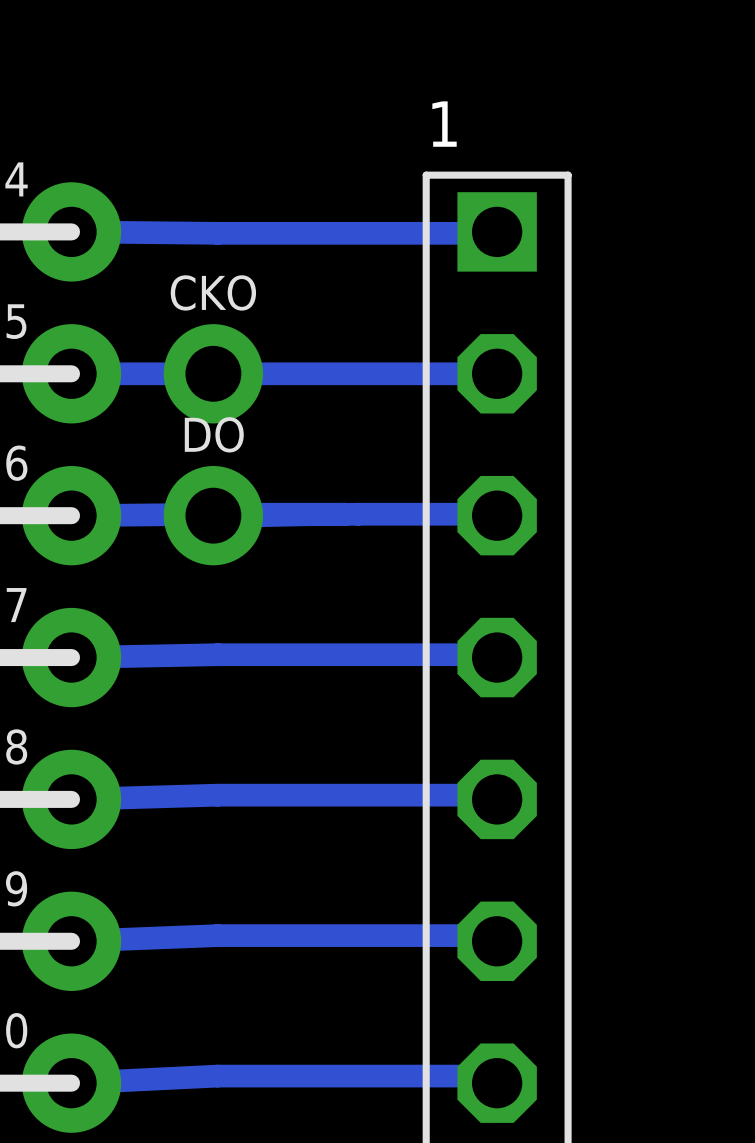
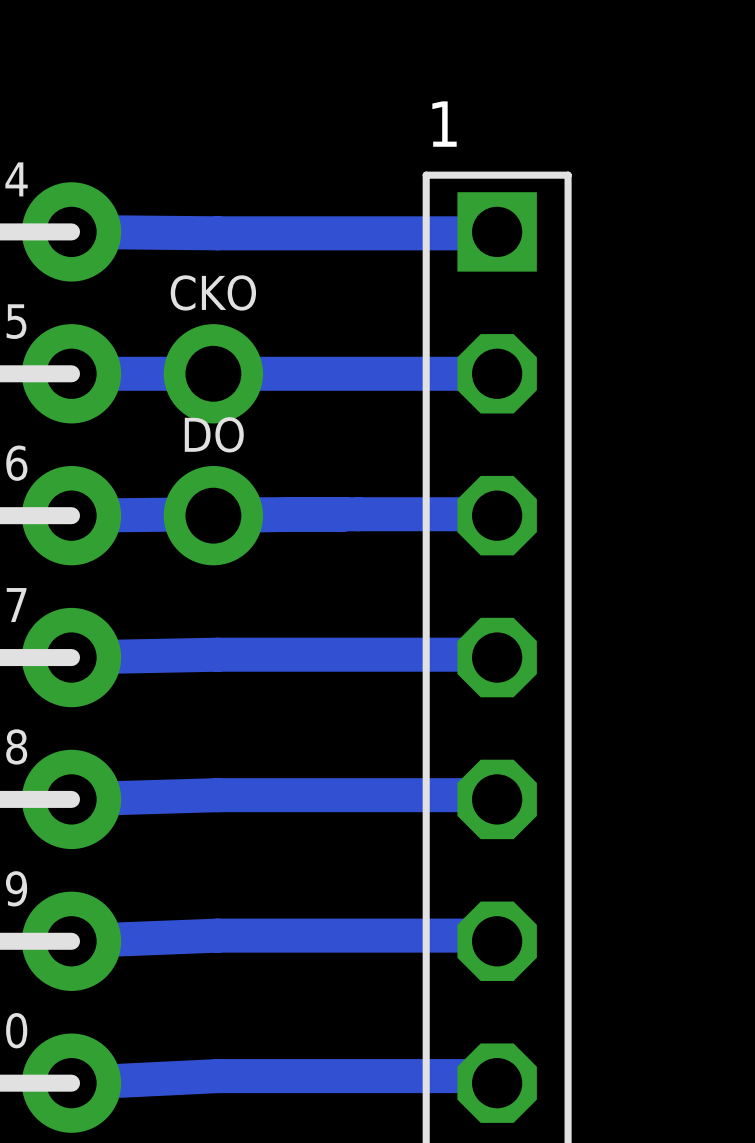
bottom track width: thin (71, 231) (497, 231) -> thick (71, 231) (497, 231)
bottom track width: thin (71, 373) (497, 373) -> thick (71, 373) (497, 373)
bottom track width: thin (71, 515) (497, 515) -> thick (71, 515) (497, 515)
bottom track width: thin (71, 657) (217, 654) (485, 654) (497, 657) -> thick (71, 657) (217, 654) (485, 654) (497, 657)
bottom track width: thin (71, 799) (217, 795) (485, 795) (497, 799) -> thick (71, 799) (217, 795) (485, 795) (497, 799)
bottom track width: thin (71, 941) (217, 935) (485, 935) (497, 941) -> thick (71, 941) (217, 935) (485, 935) (497, 941)
bottom track width: thin (71, 1083) (217, 1076) (485, 1076) (497, 1083) -> thick (71, 1083) (217, 1076) (485, 1076) (497, 1083)

